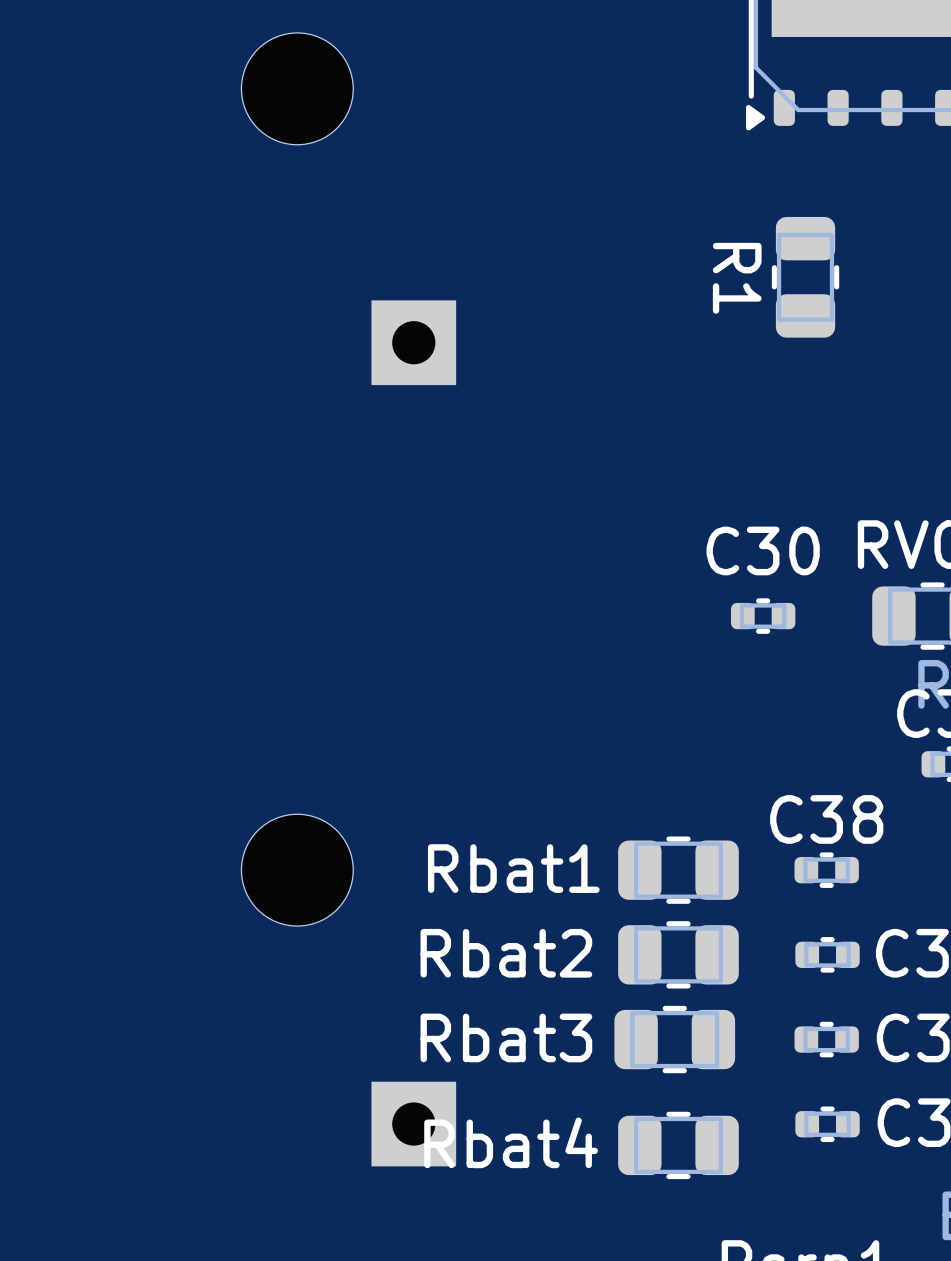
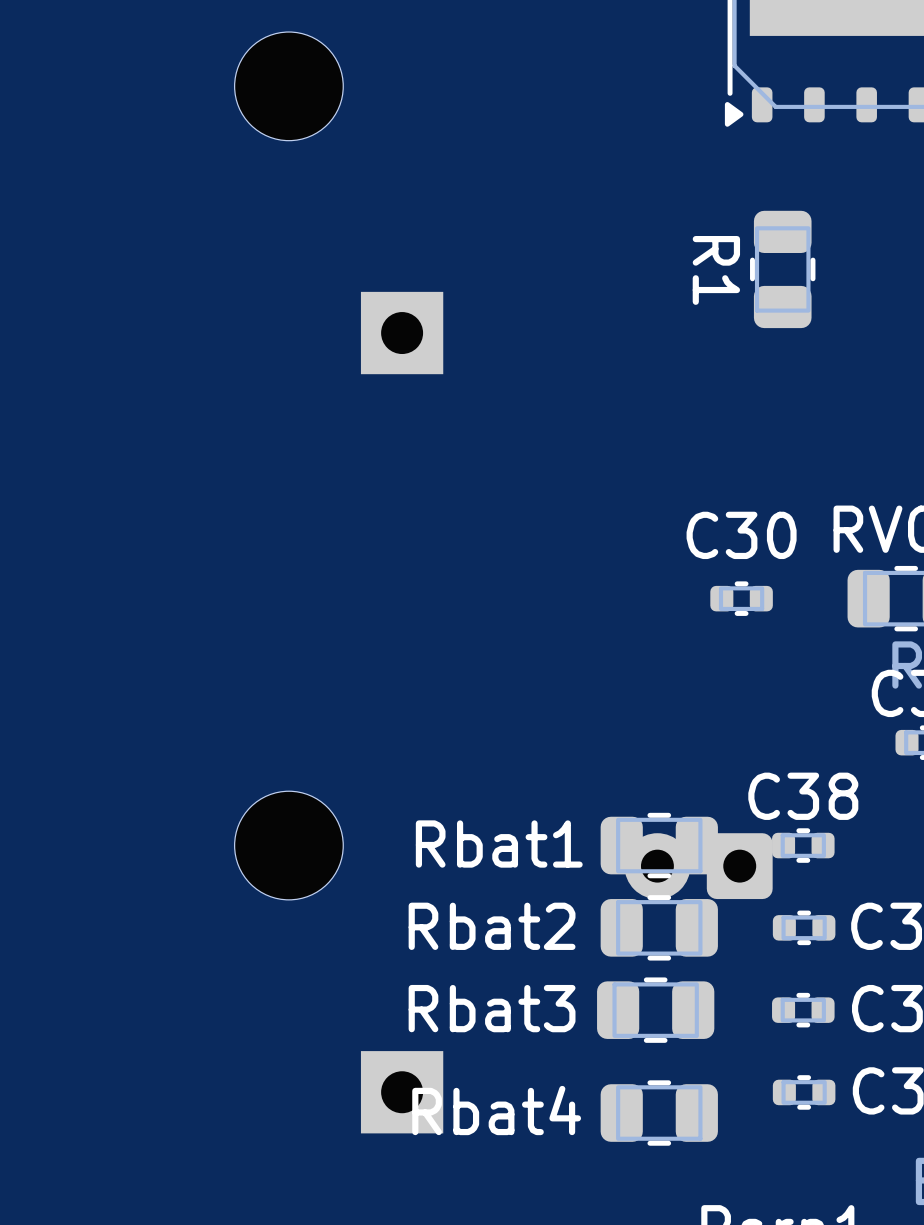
part: none -> (698, 866)

